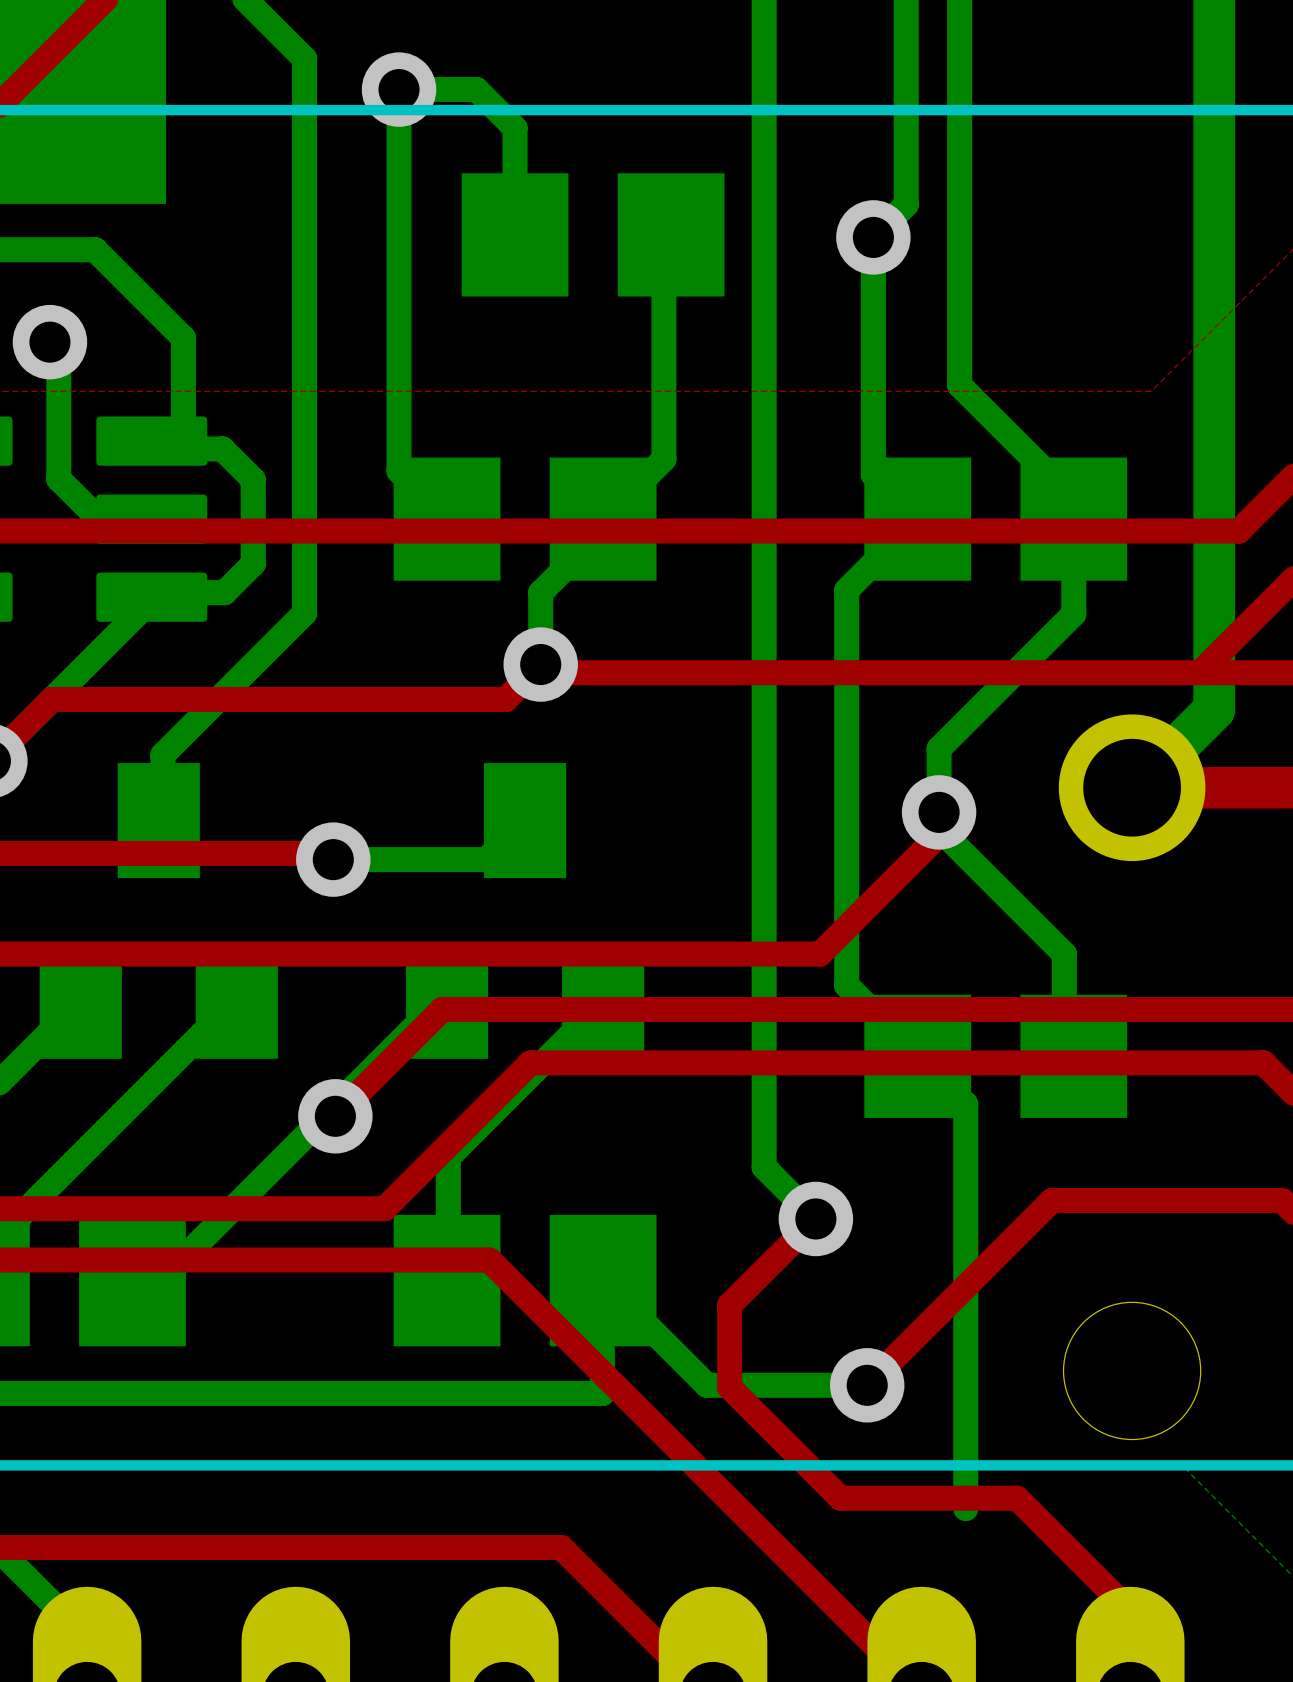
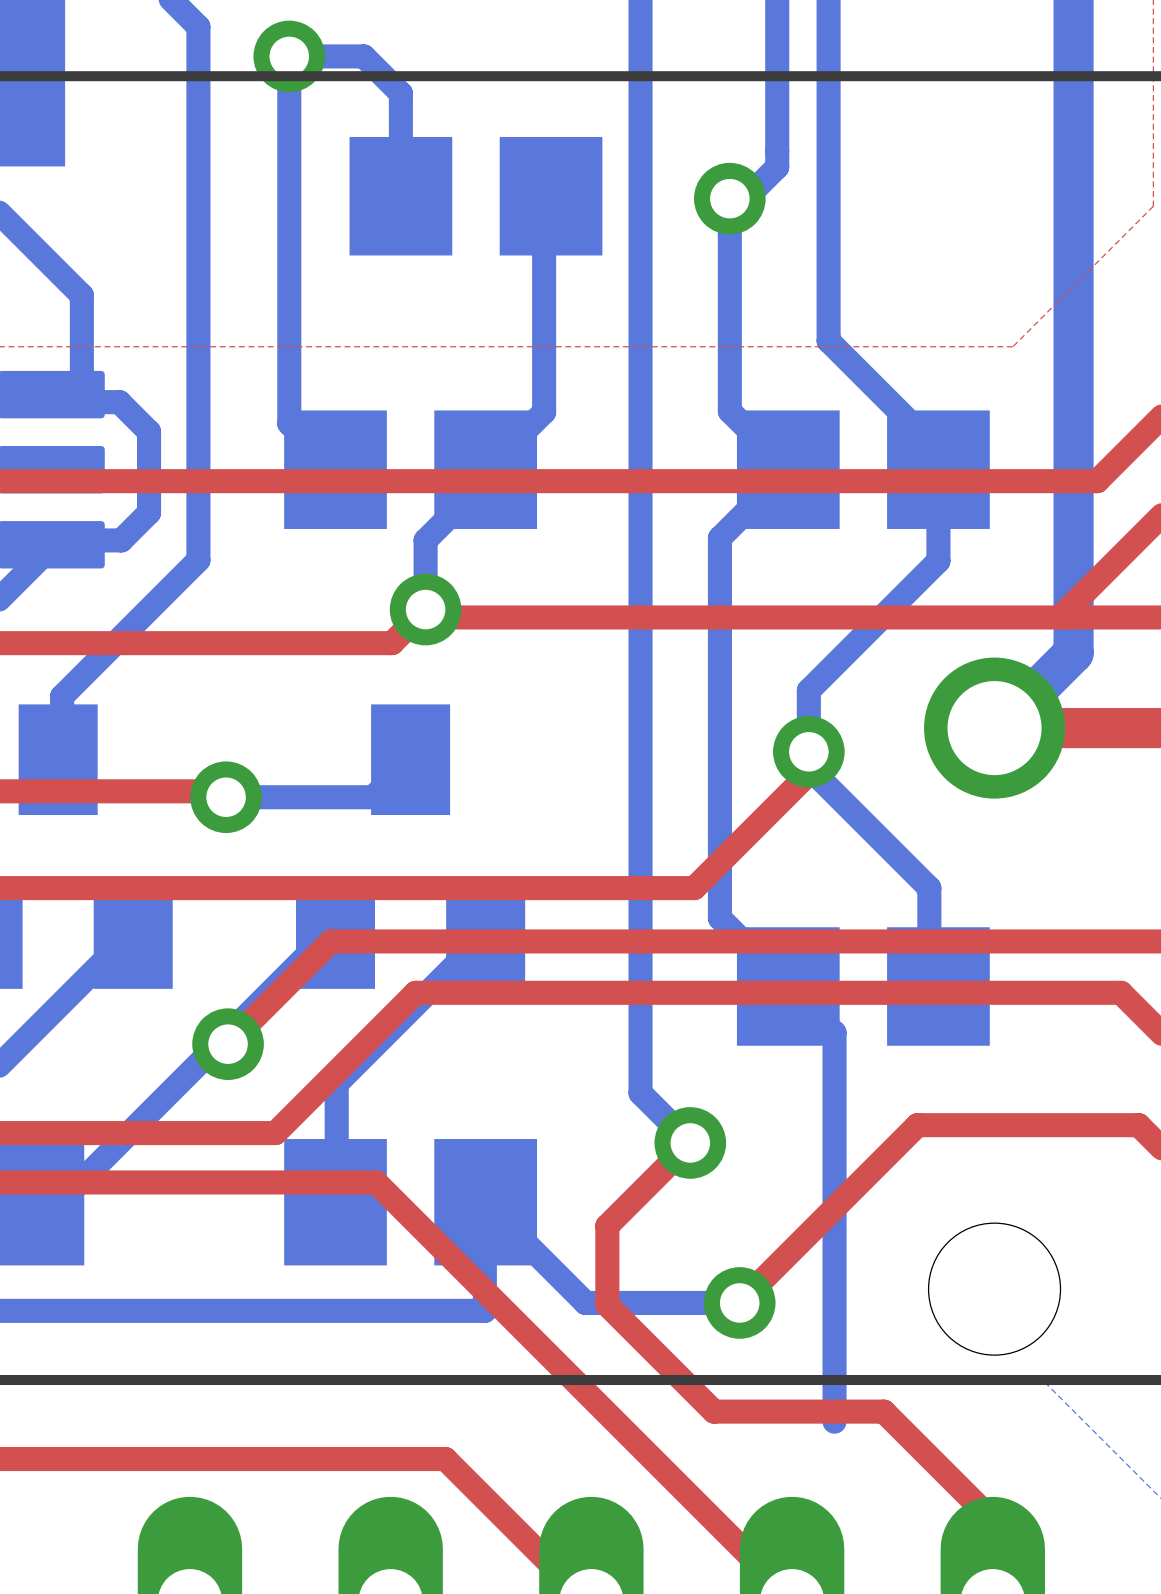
bottom track: (873, 233) (873, 474) -> (729, 194) (729, 411) (745, 427)
via position: (873, 237) -> (729, 198)

